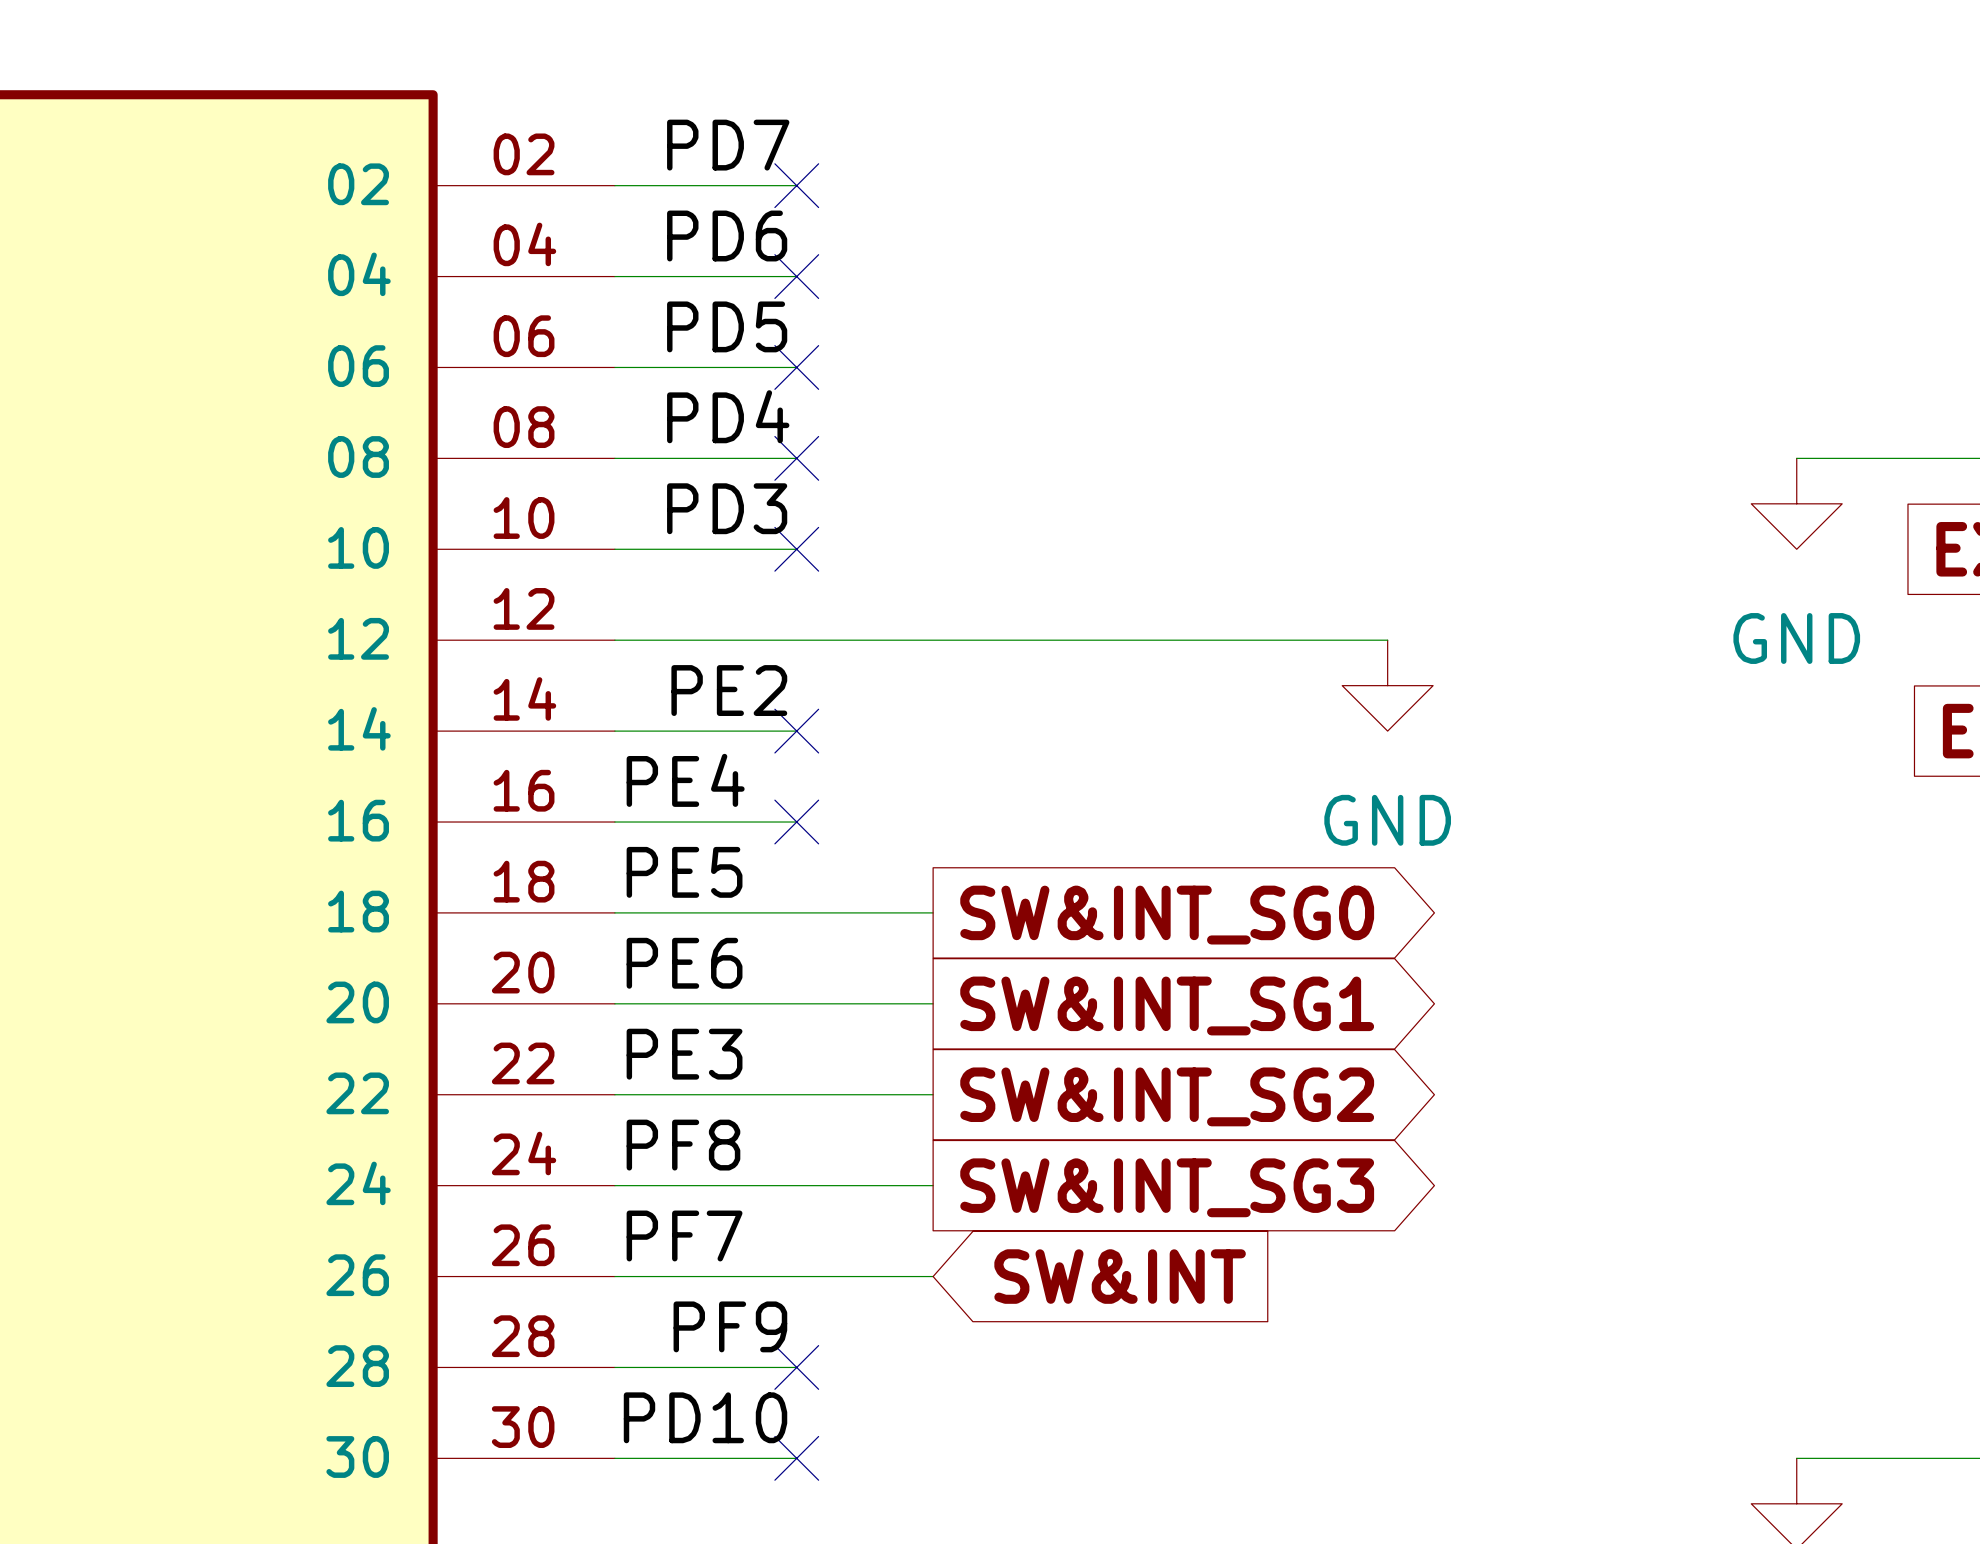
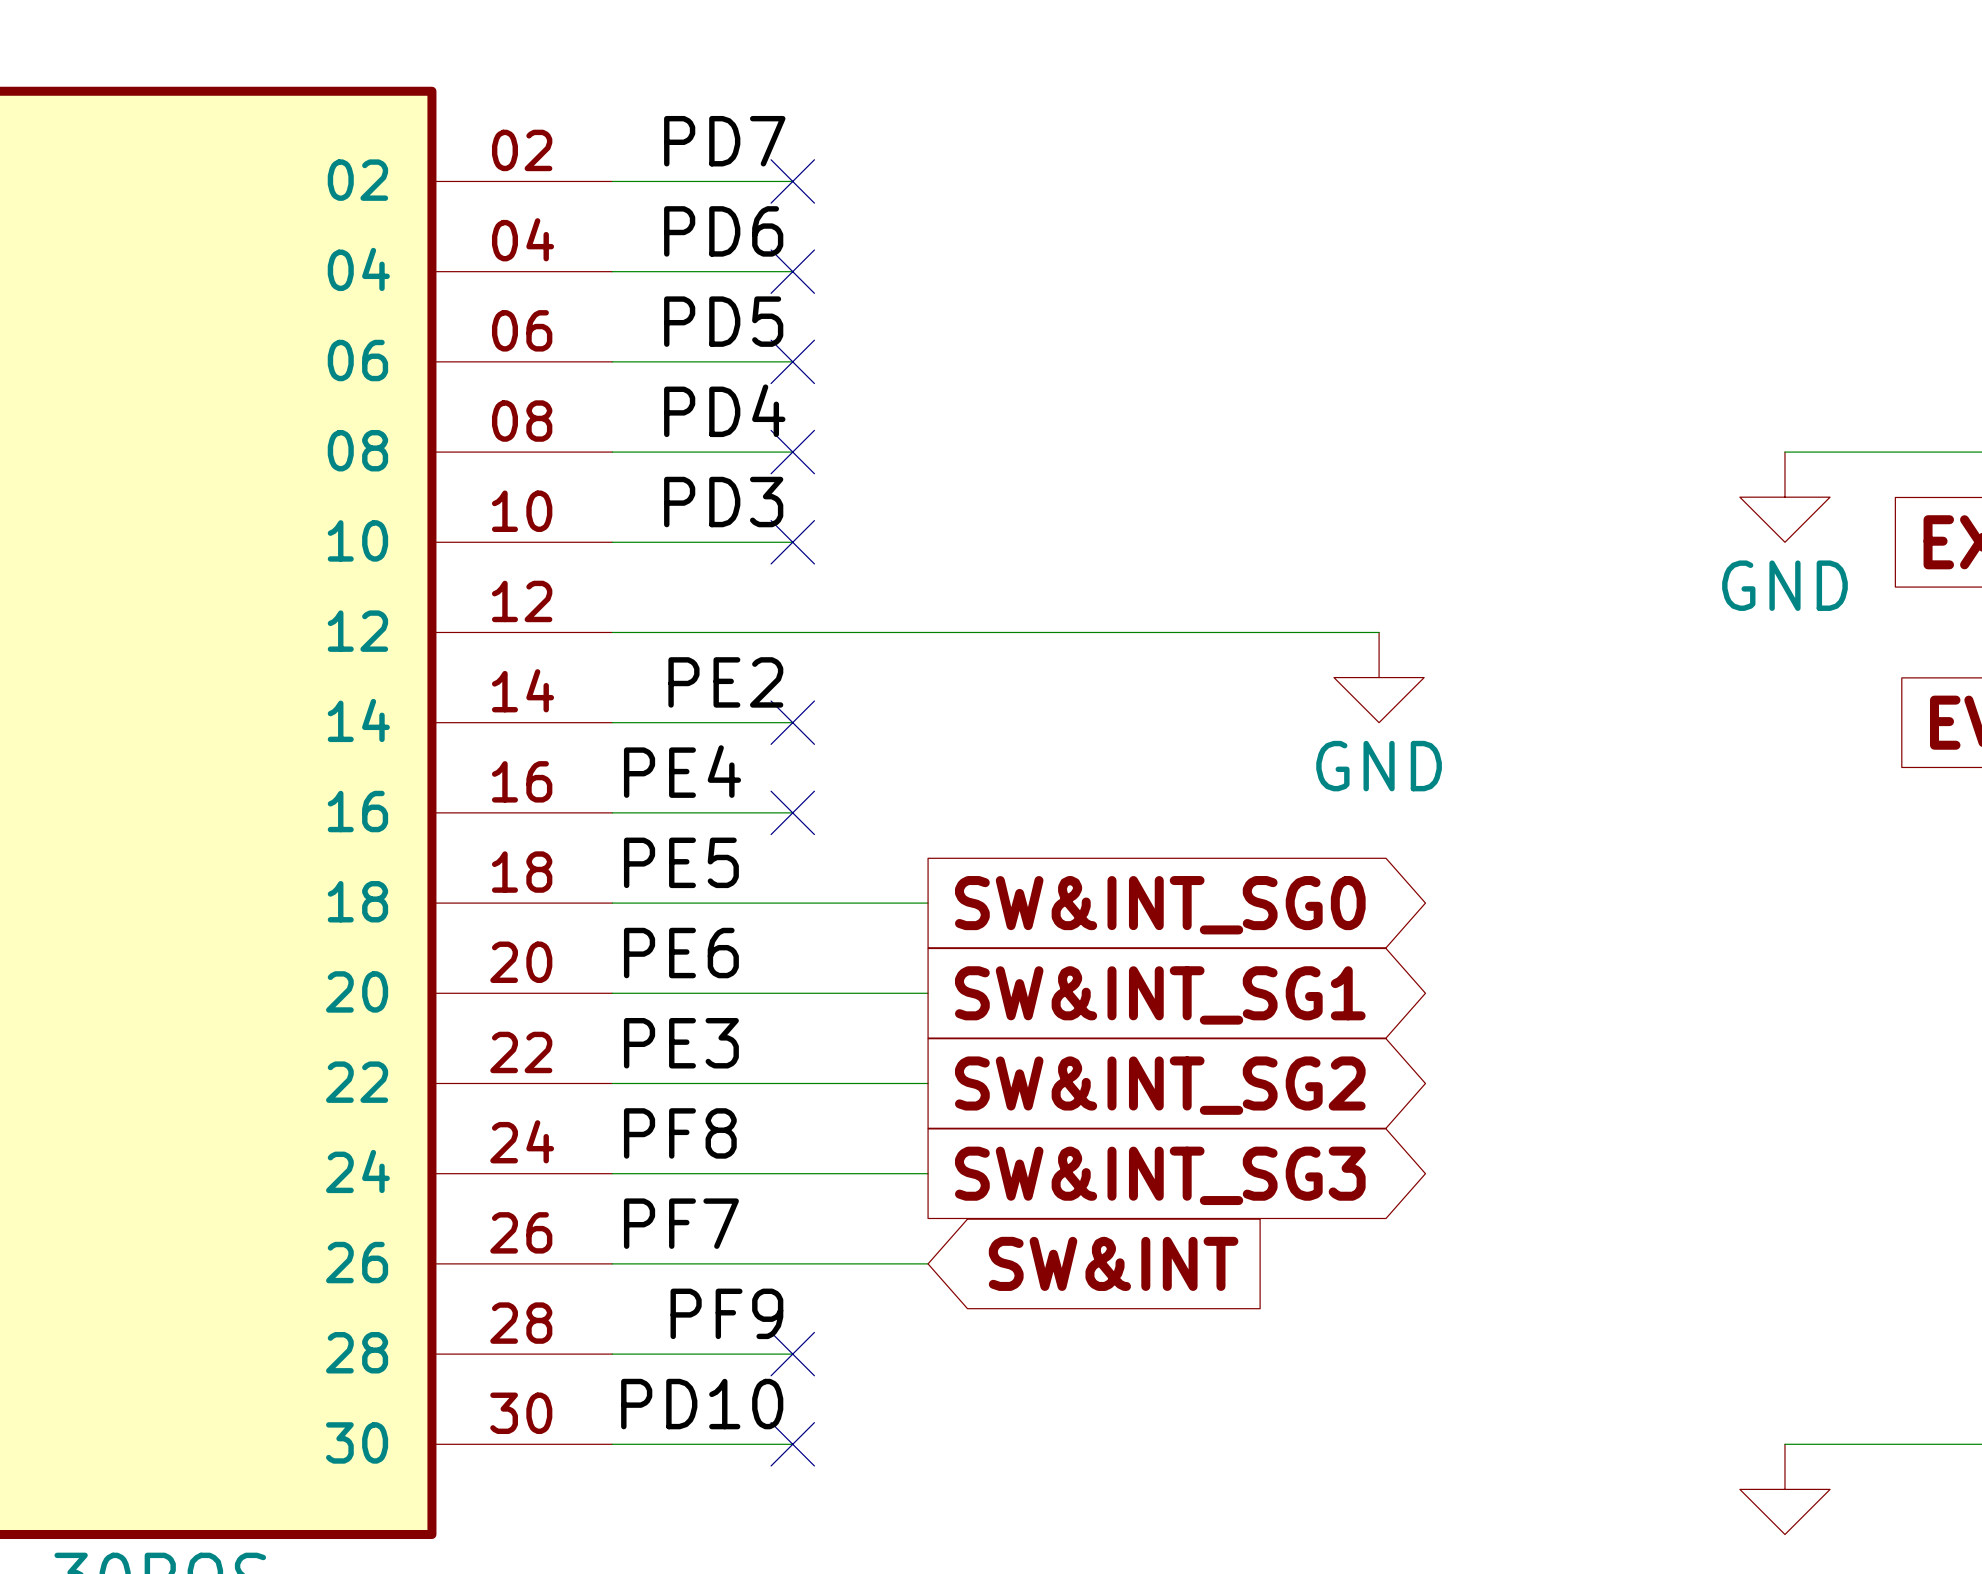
power symbol text position: GND (1796, 638) -> GND (1784, 585)
power symbol text position: GND (1387, 820) -> GND (1379, 766)

